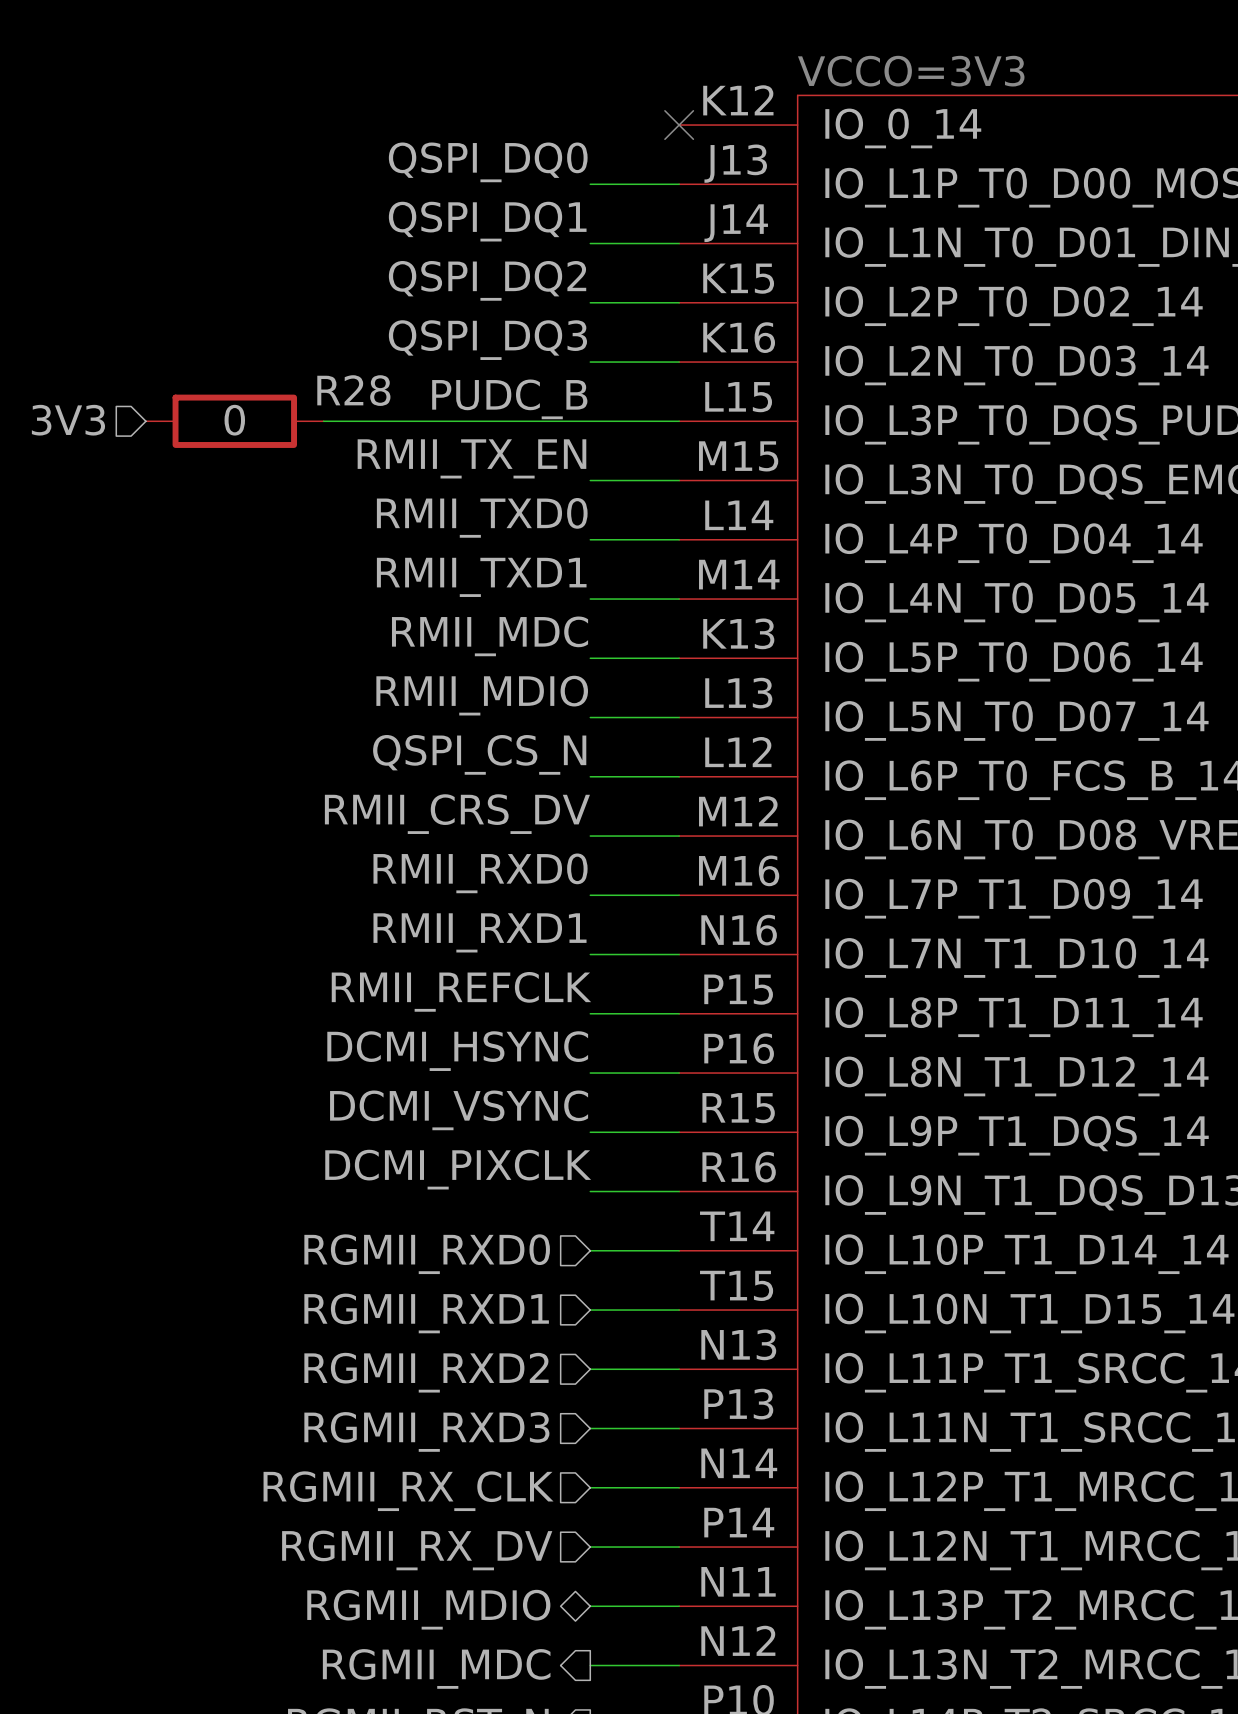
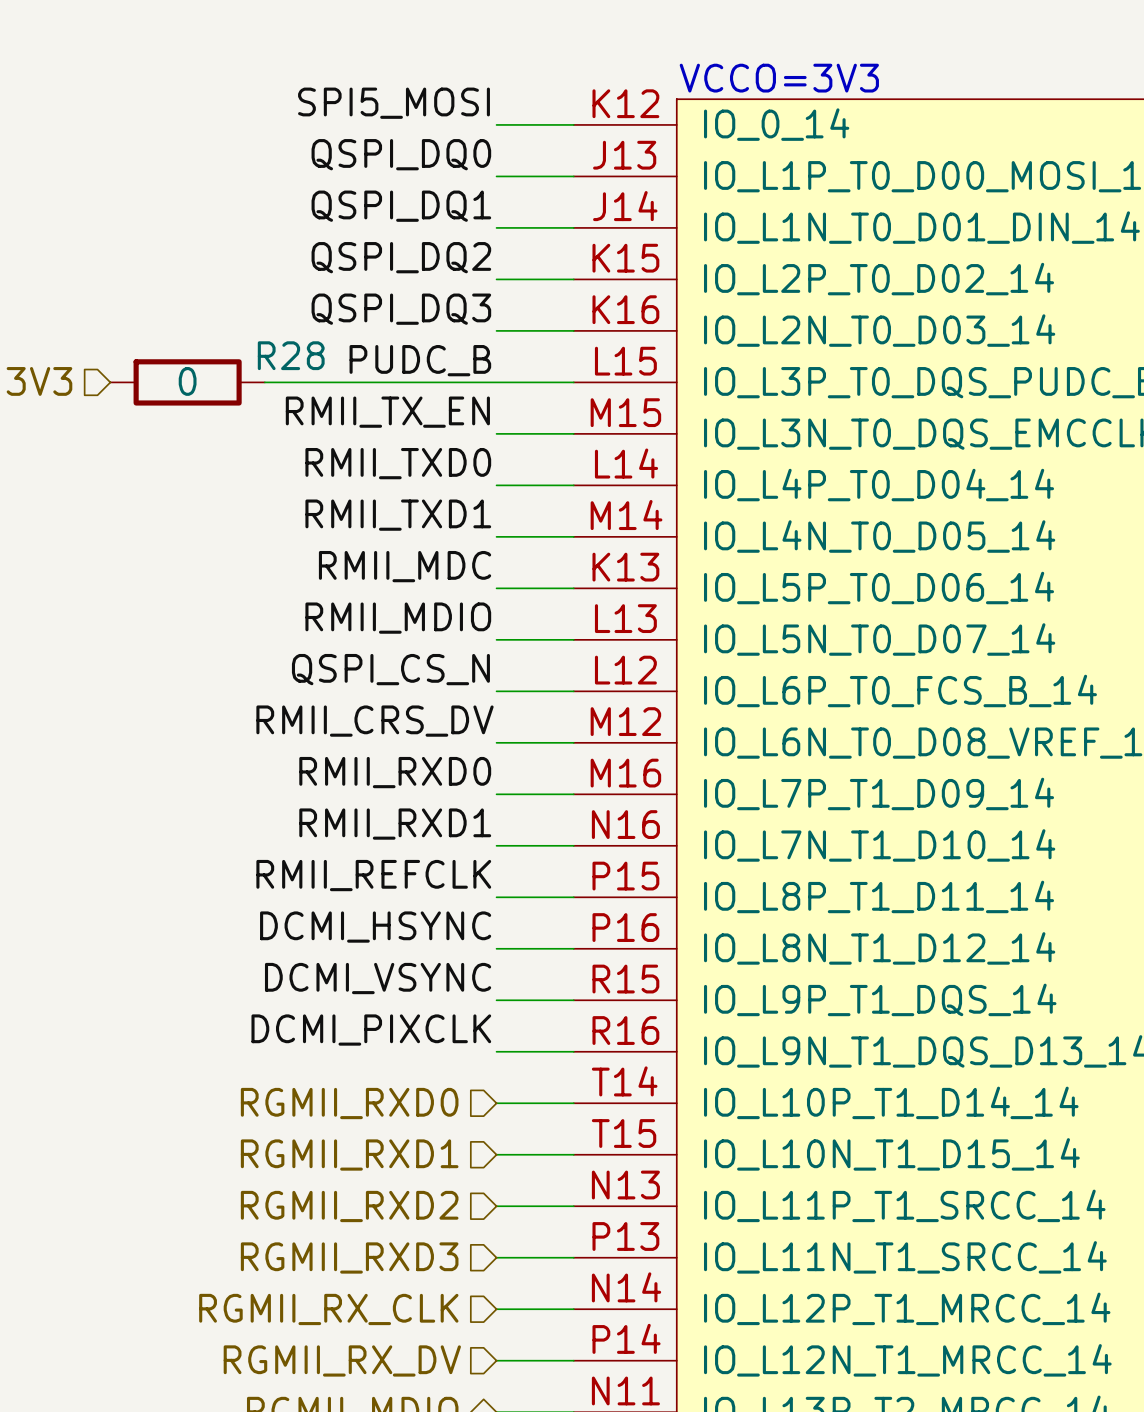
label: none -> SPI5_MOSI (394, 103)
wire: none -> (496, 124) (573, 124)
no-connect mark: (679, 125) -> none

